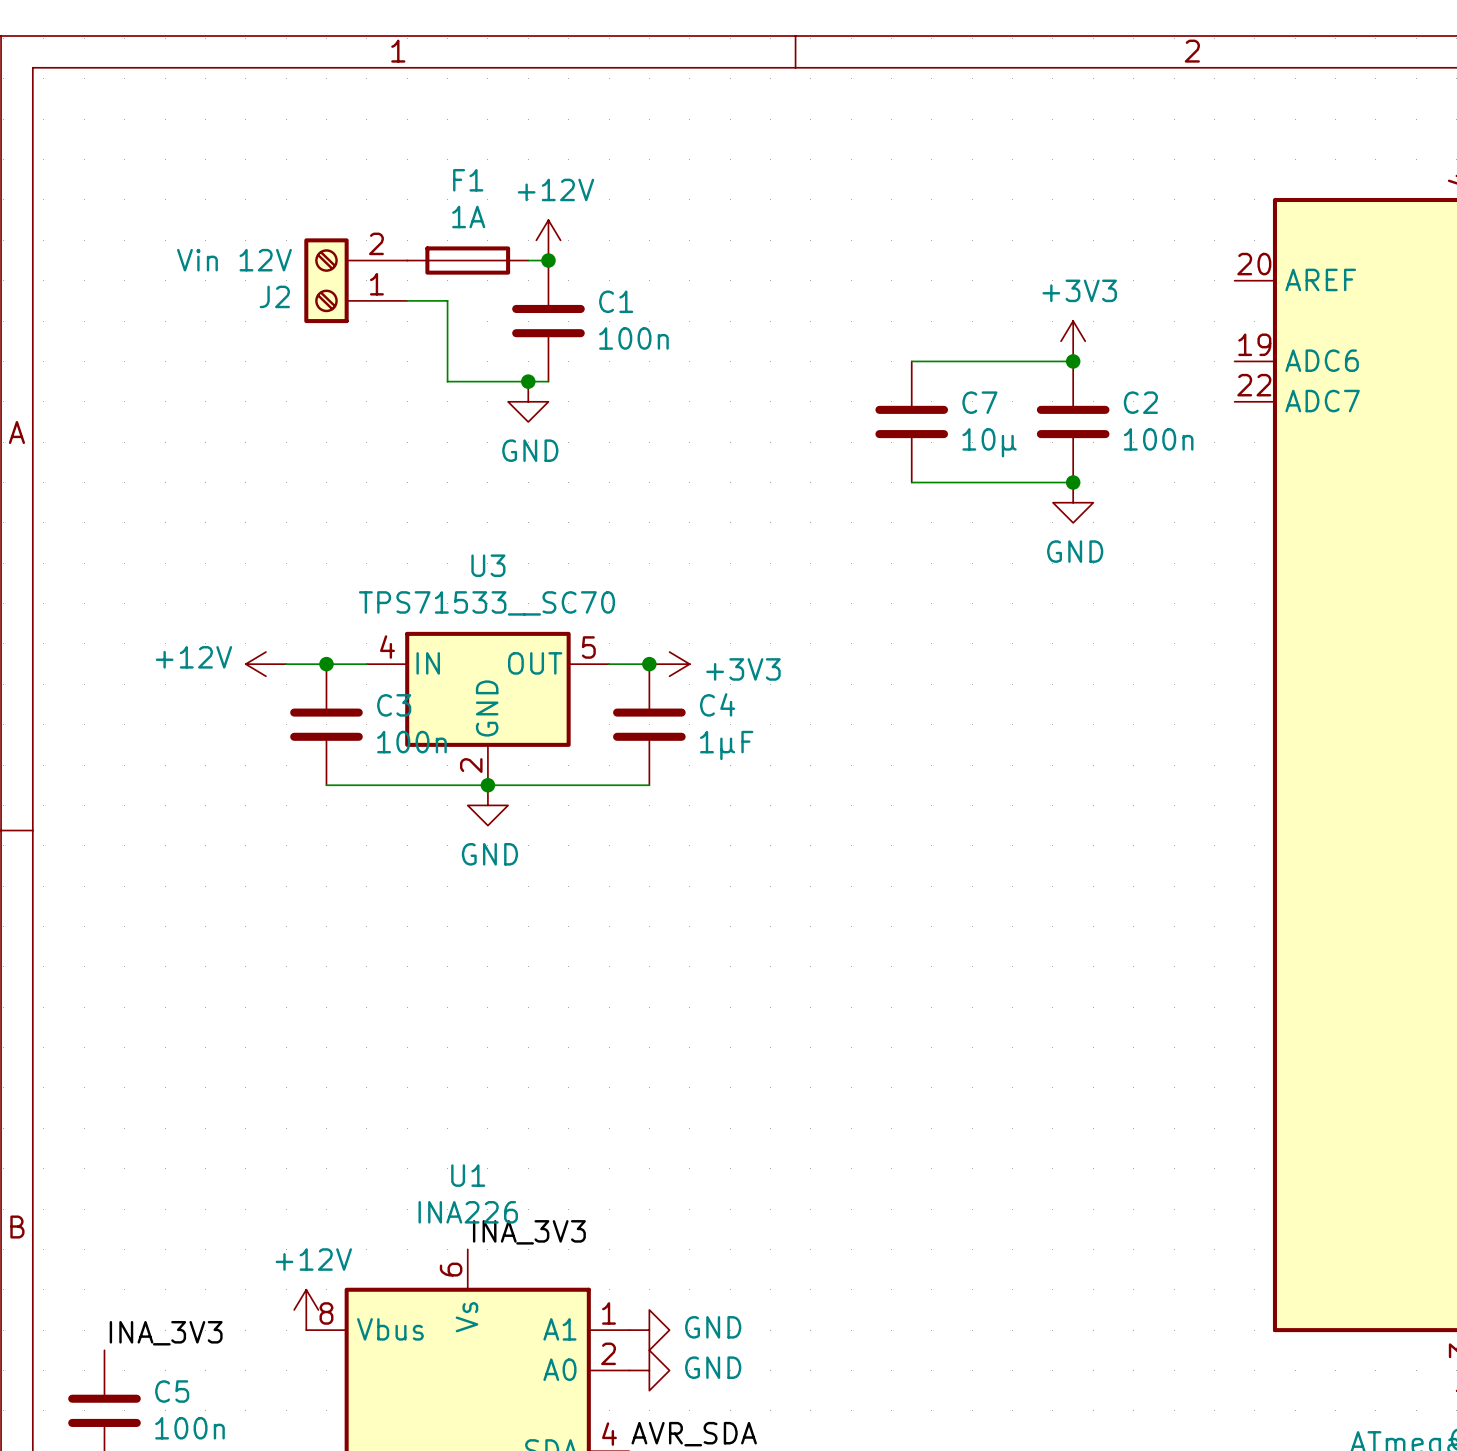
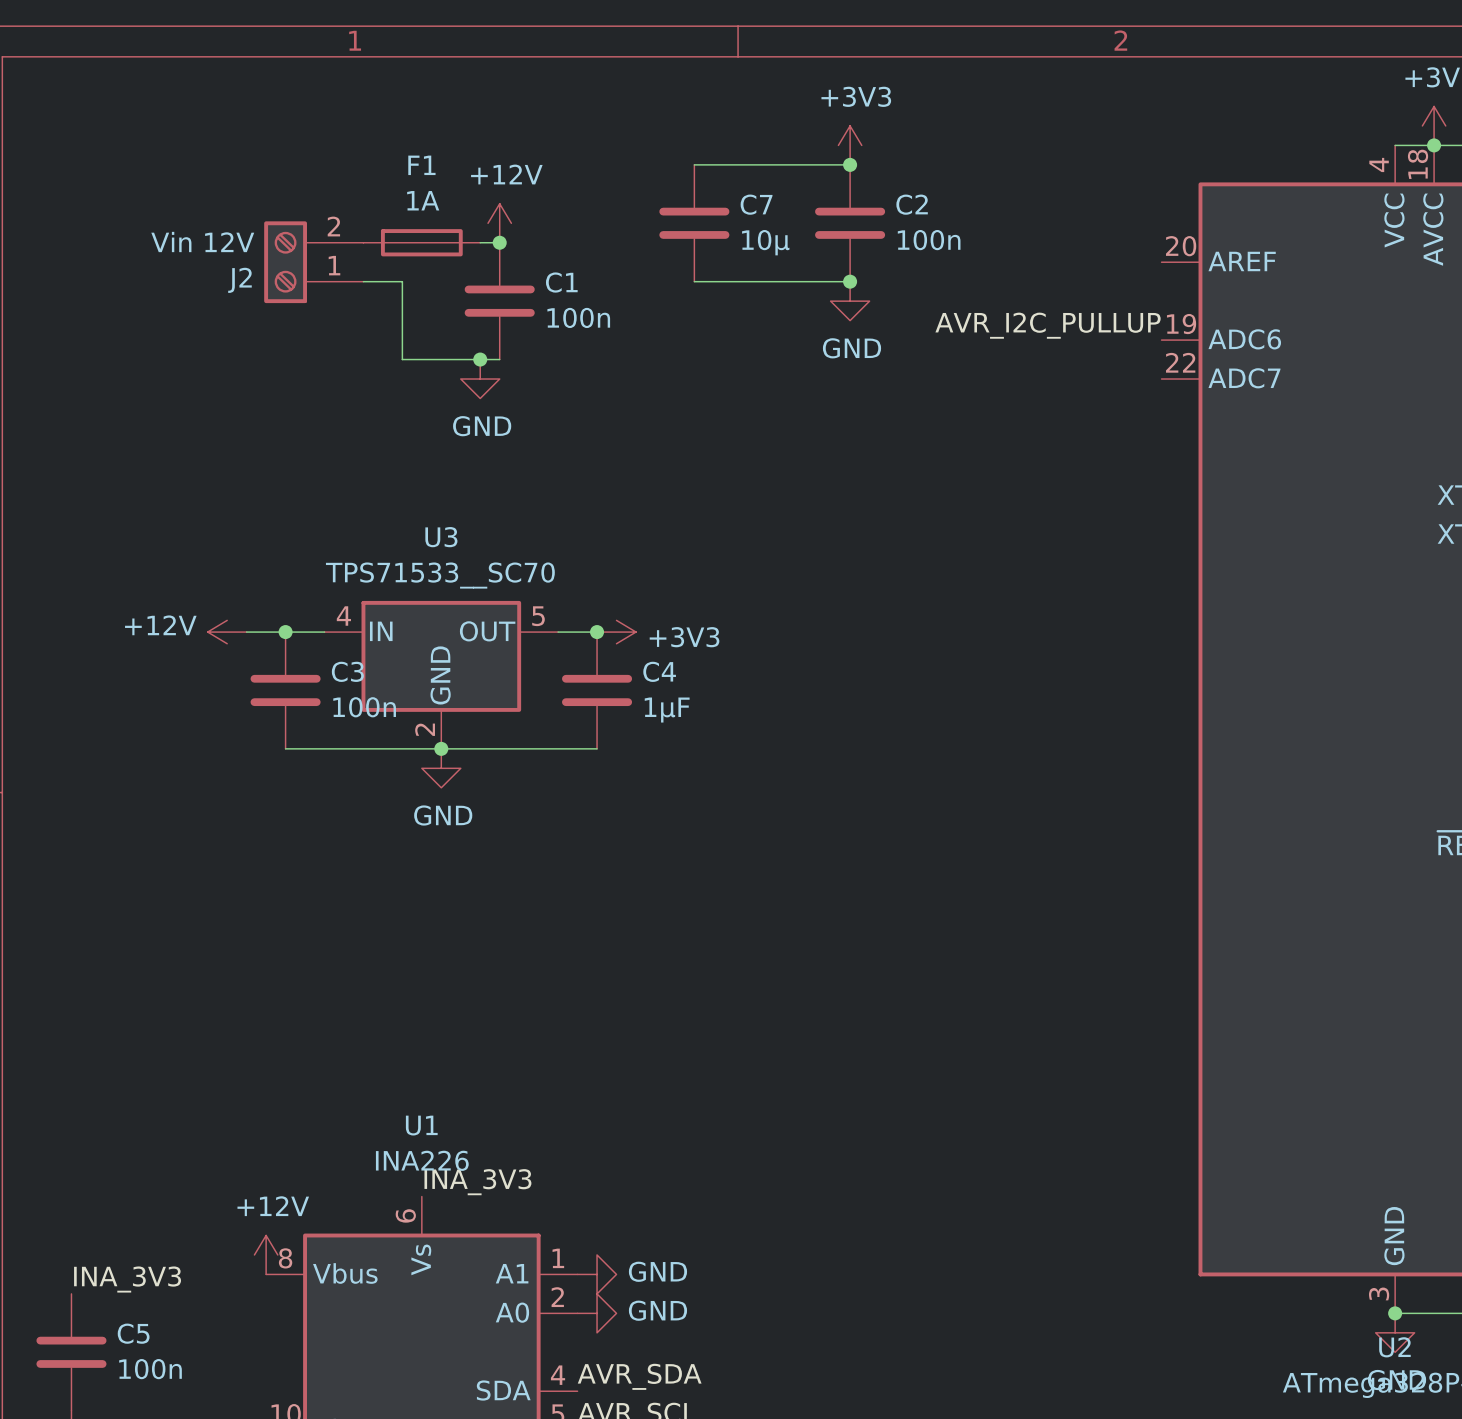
junction: none -> (850, 164)
junction: none -> (850, 281)
power symbol position: +3V3 (1073, 341) -> +3V3 (850, 145)
label: none -> AVR_I2C_PULLUP (1048, 325)
wire: (911, 361) (1073, 361) -> (694, 281) (850, 281)
junction: (1073, 361) -> none
C7 position: (911, 421) -> (694, 223)
C2 position: (1073, 421) -> (850, 223)
wire: (911, 482) (1073, 482) -> (694, 164) (850, 164)
junction: (1073, 482) -> none
power symbol position: GND (1073, 502) -> GND (850, 301)

